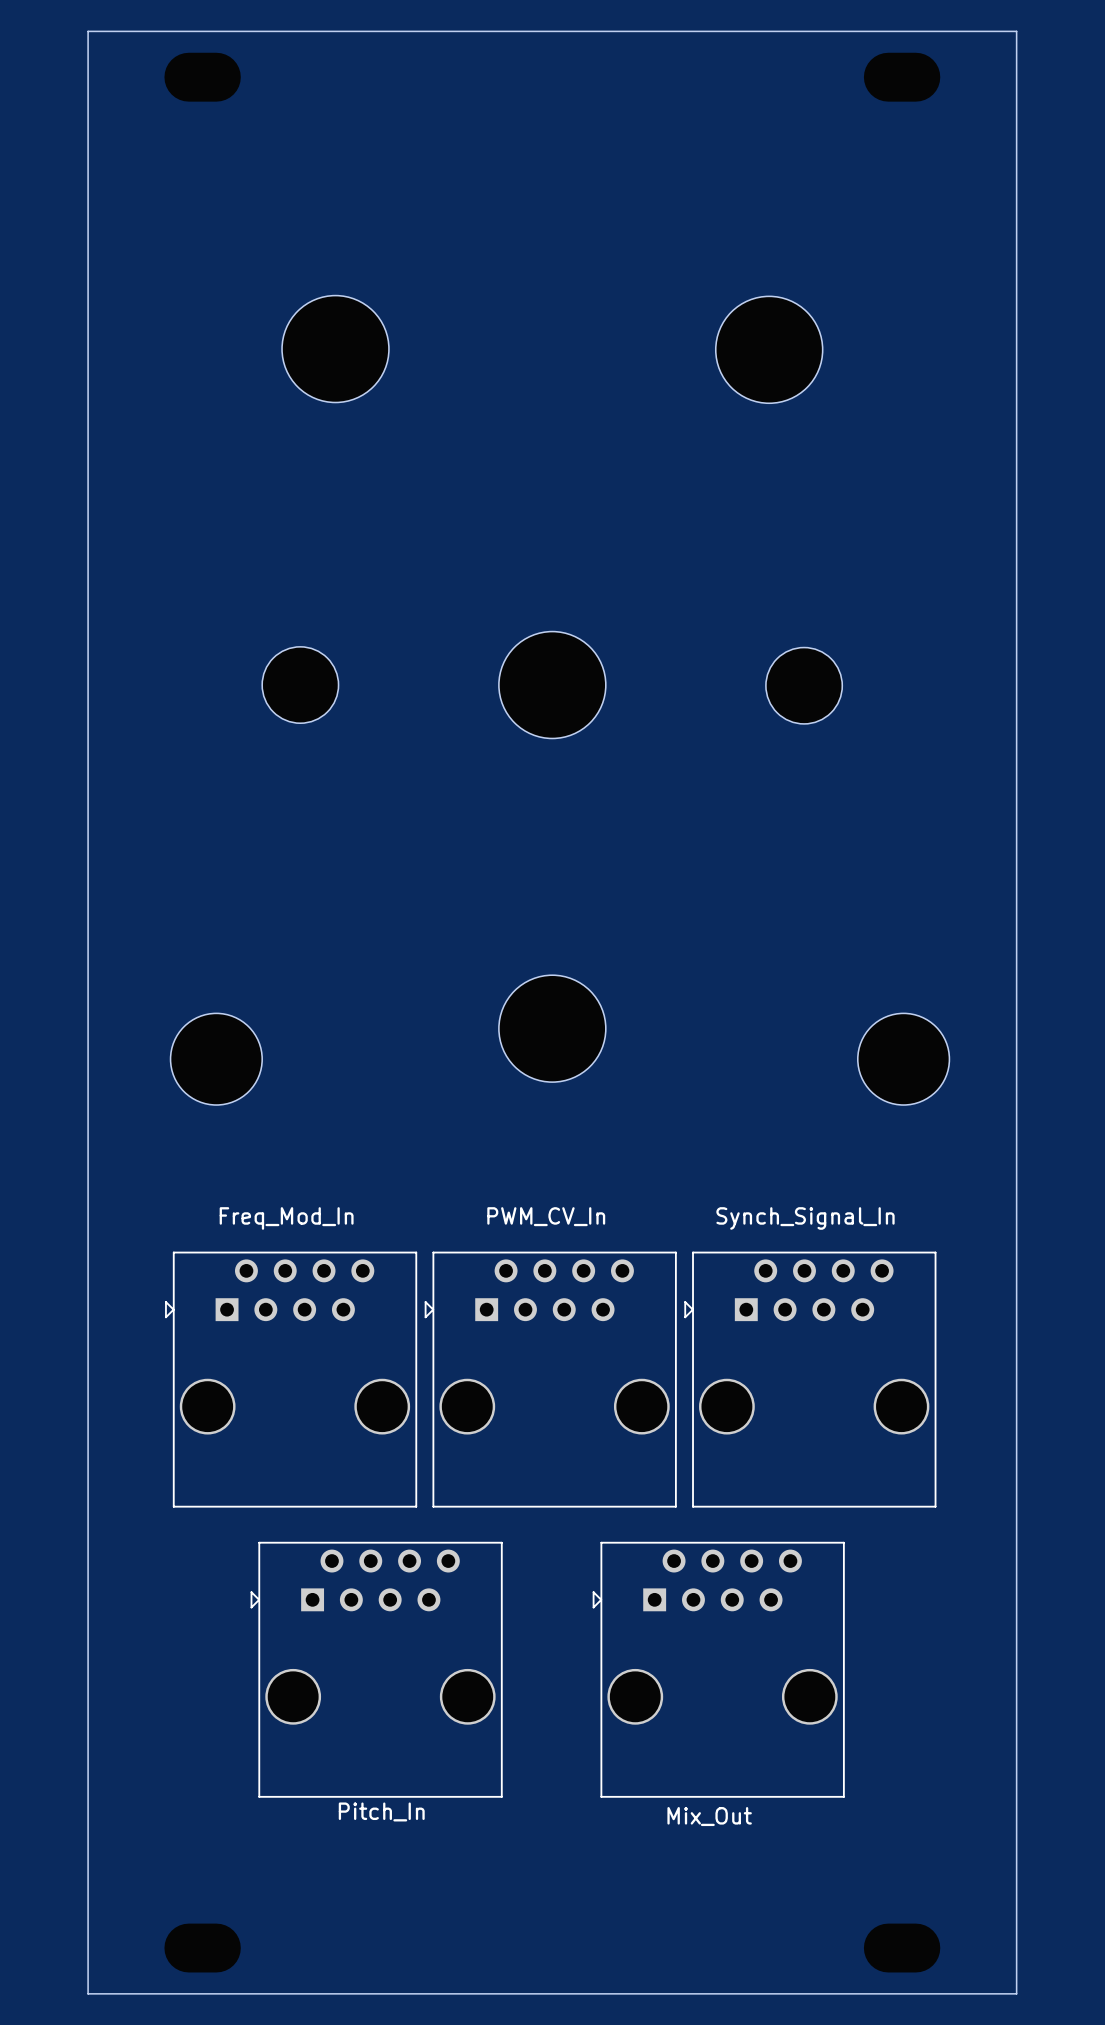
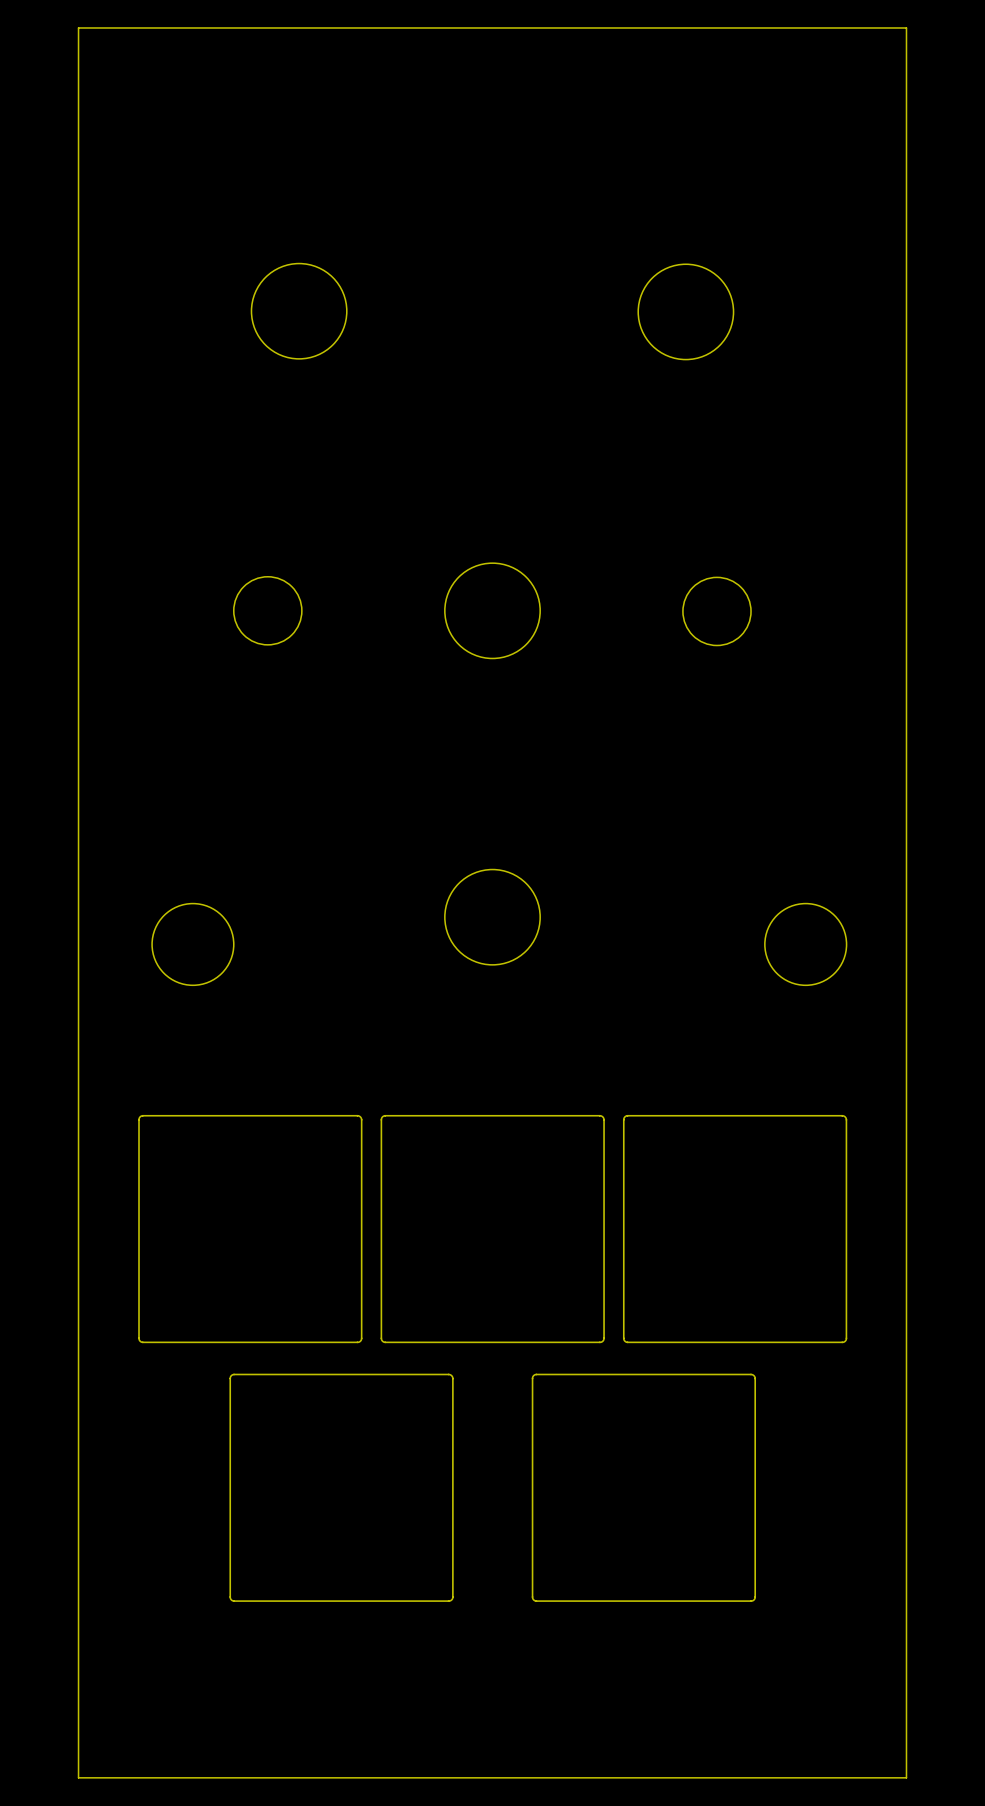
drawing: none -> [138, 1114, 363, 1344]
drawing: none -> [380, 1114, 605, 1344]
drawing: none -> [622, 1114, 848, 1344]
part: Freq_Mod_In (291, 1379) -> none
part: PWM_CV_In (550, 1379) -> none
part: Synch_Signal_In (810, 1379) -> none
drawing: none -> [229, 1373, 454, 1602]
drawing: none -> [531, 1373, 757, 1602]
part: Pitch_In (376, 1669) -> none
part: Mix_Out (718, 1669) -> none

